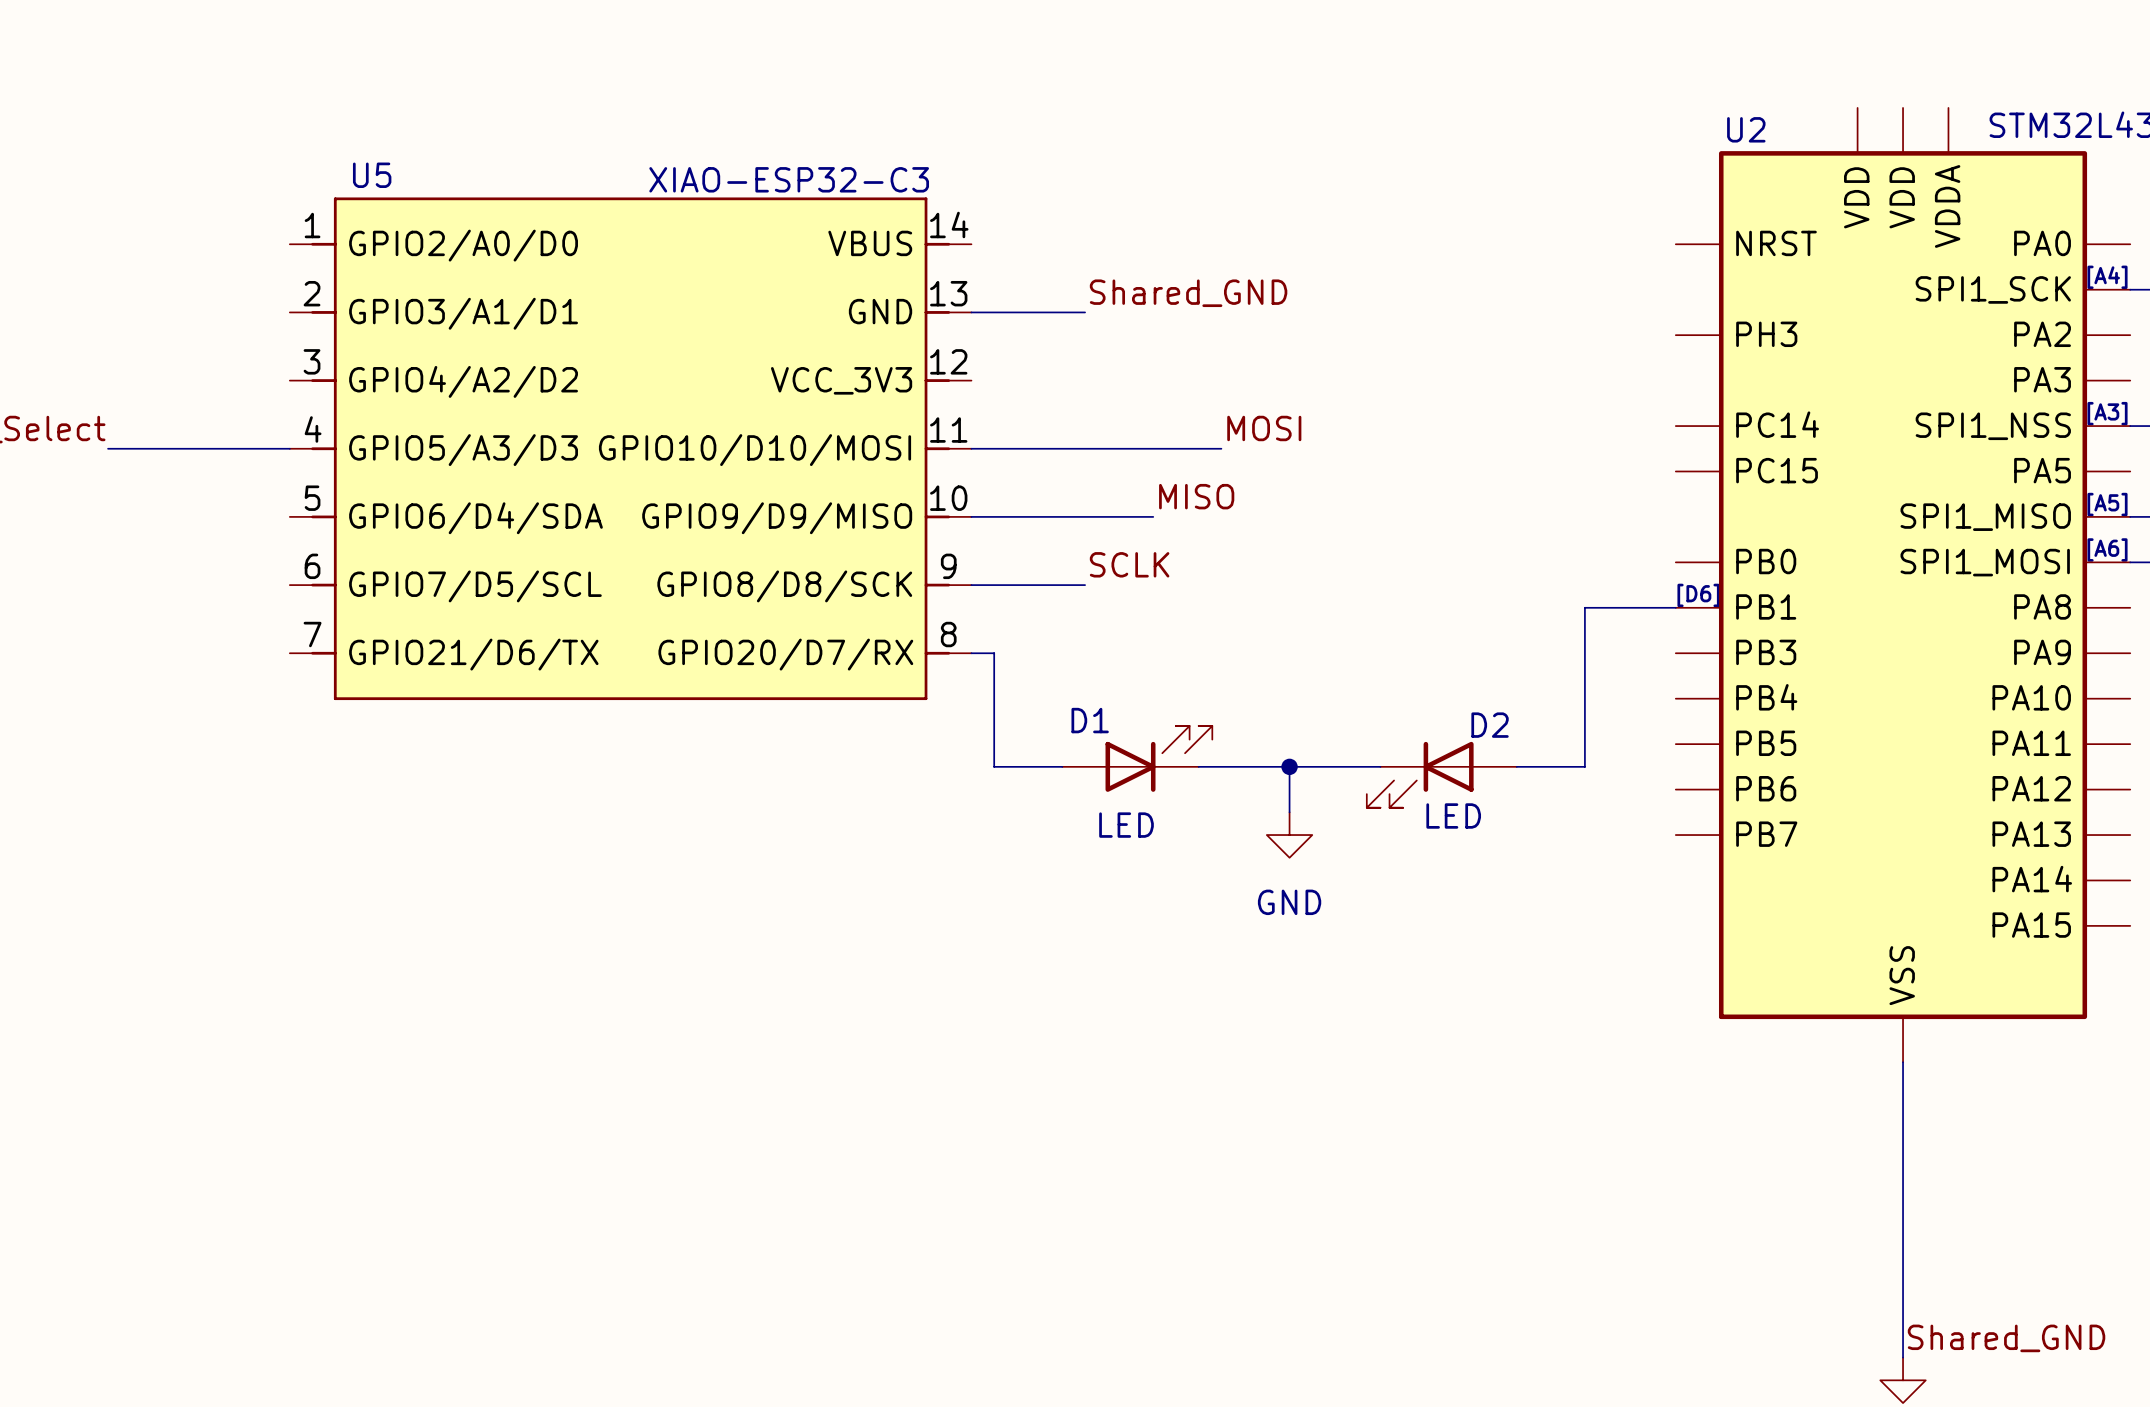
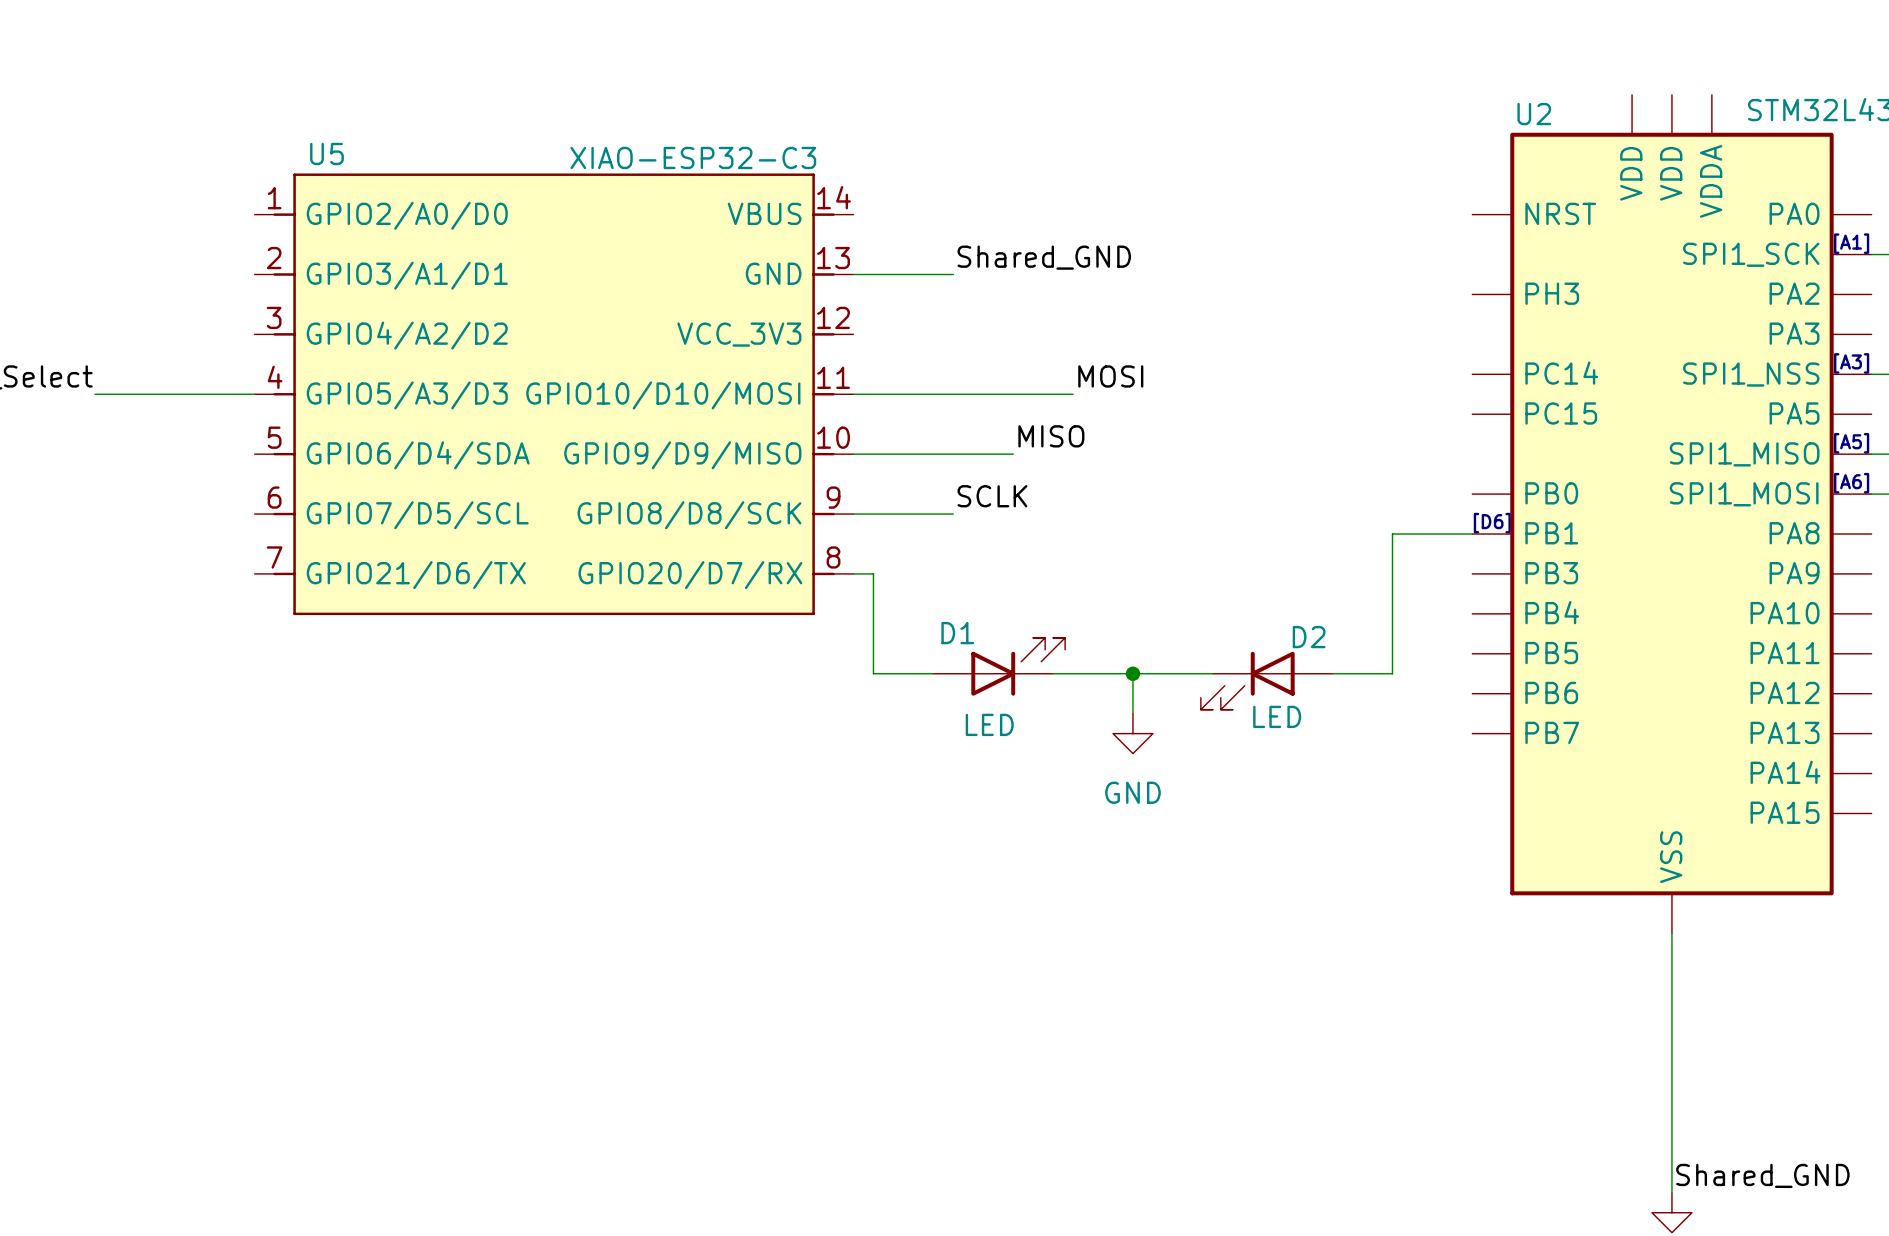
text: [A4] (2107, 277) -> [A1] (1851, 243)

